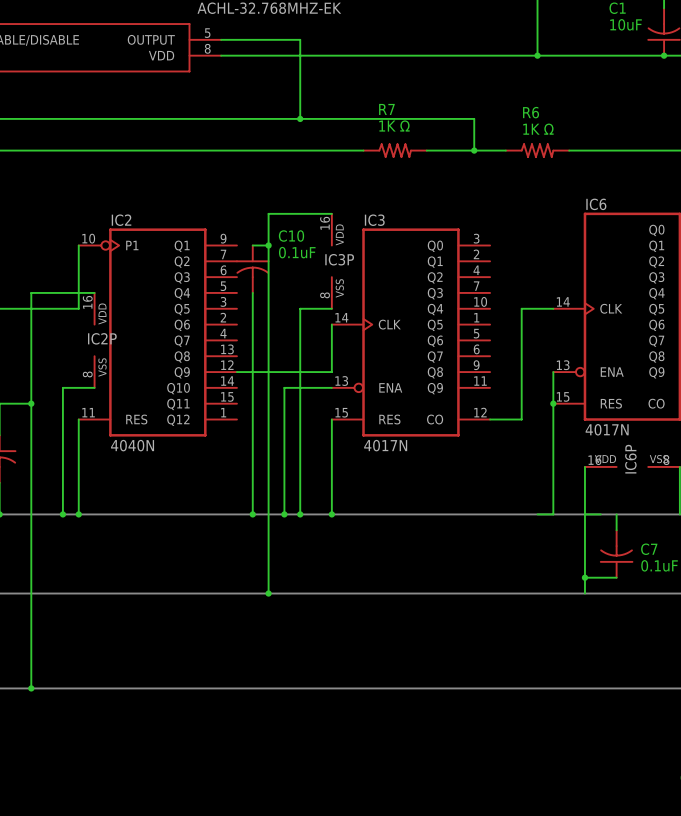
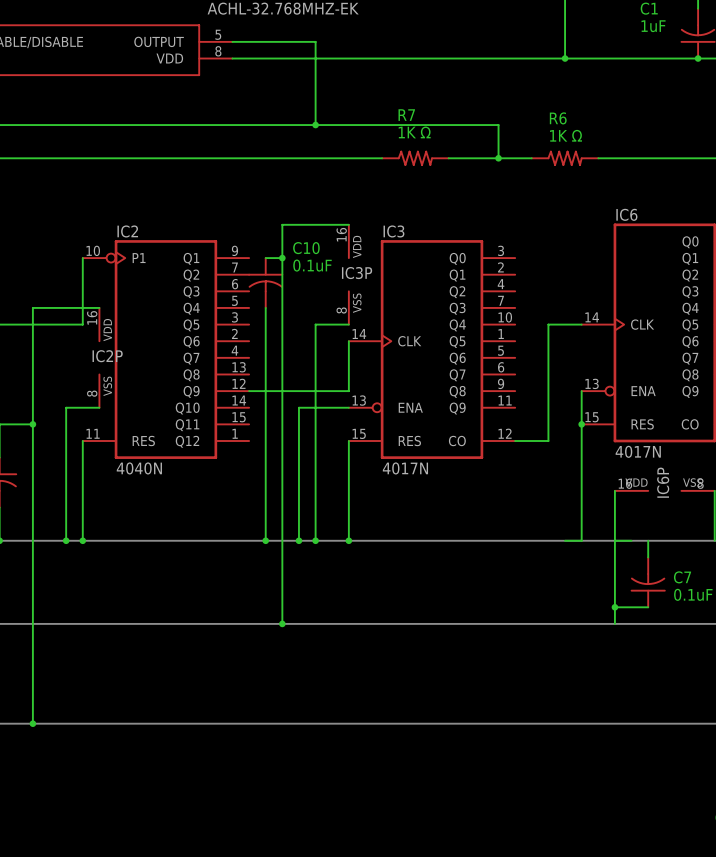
text: 10uF (626, 24) -> 1uF (653, 26)

